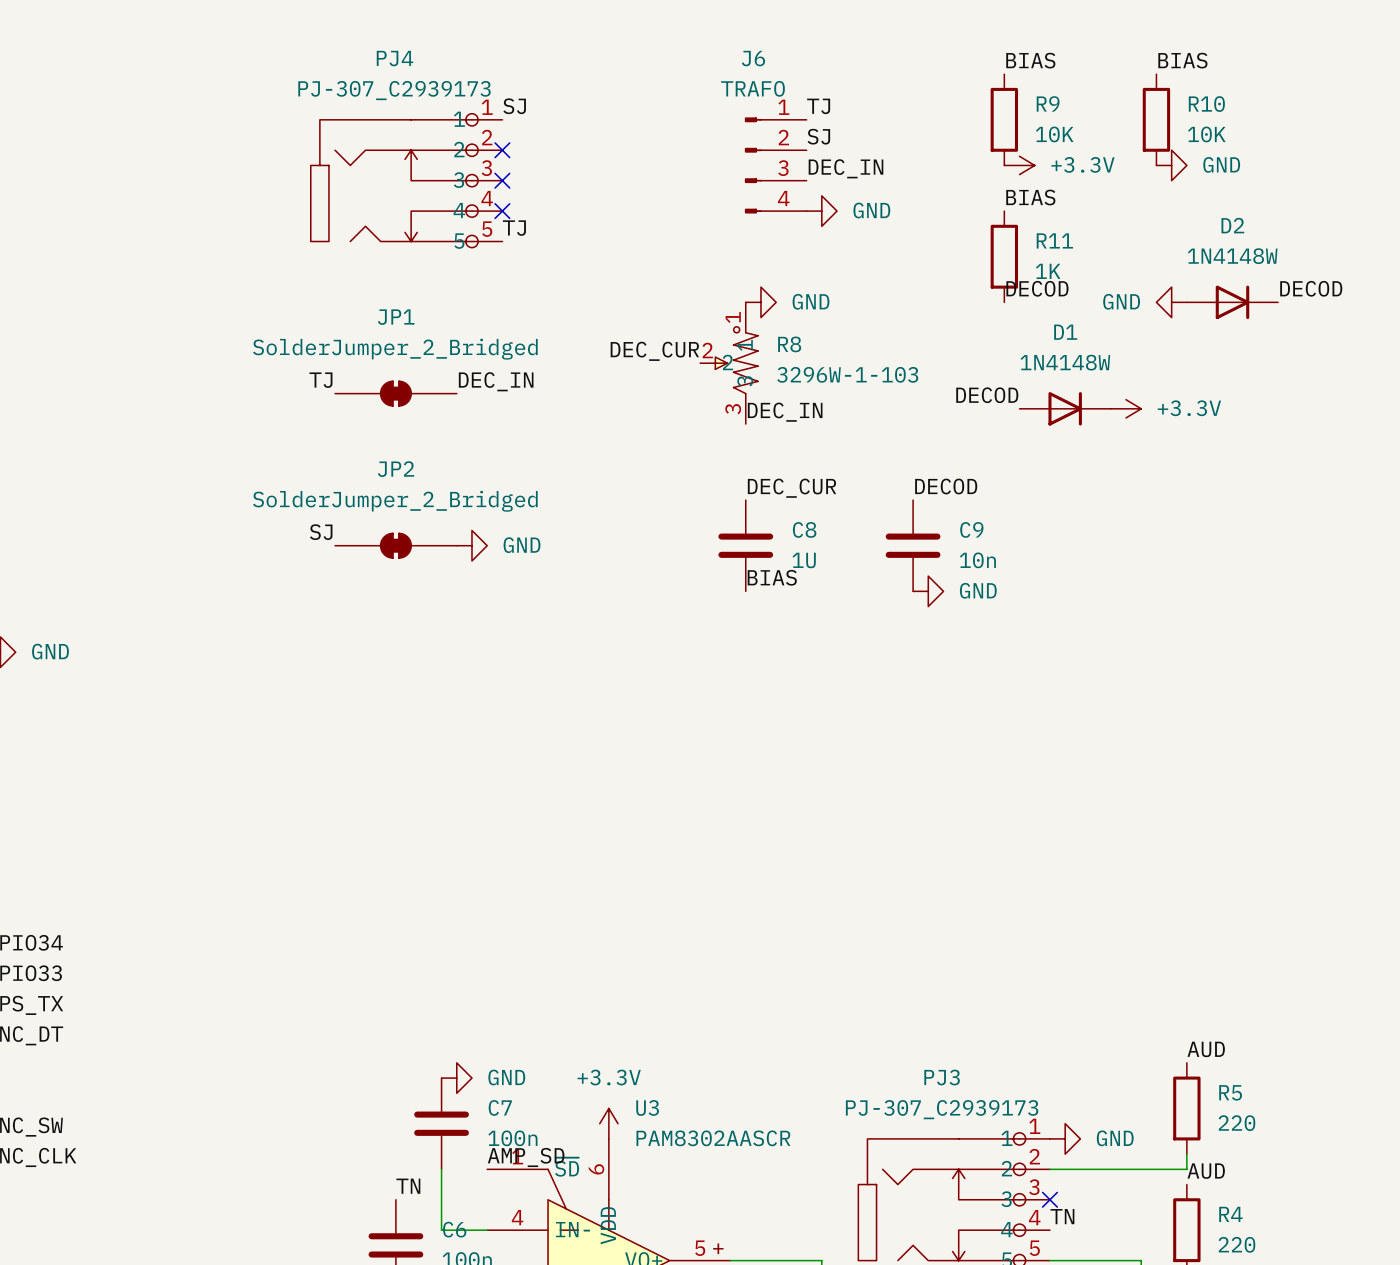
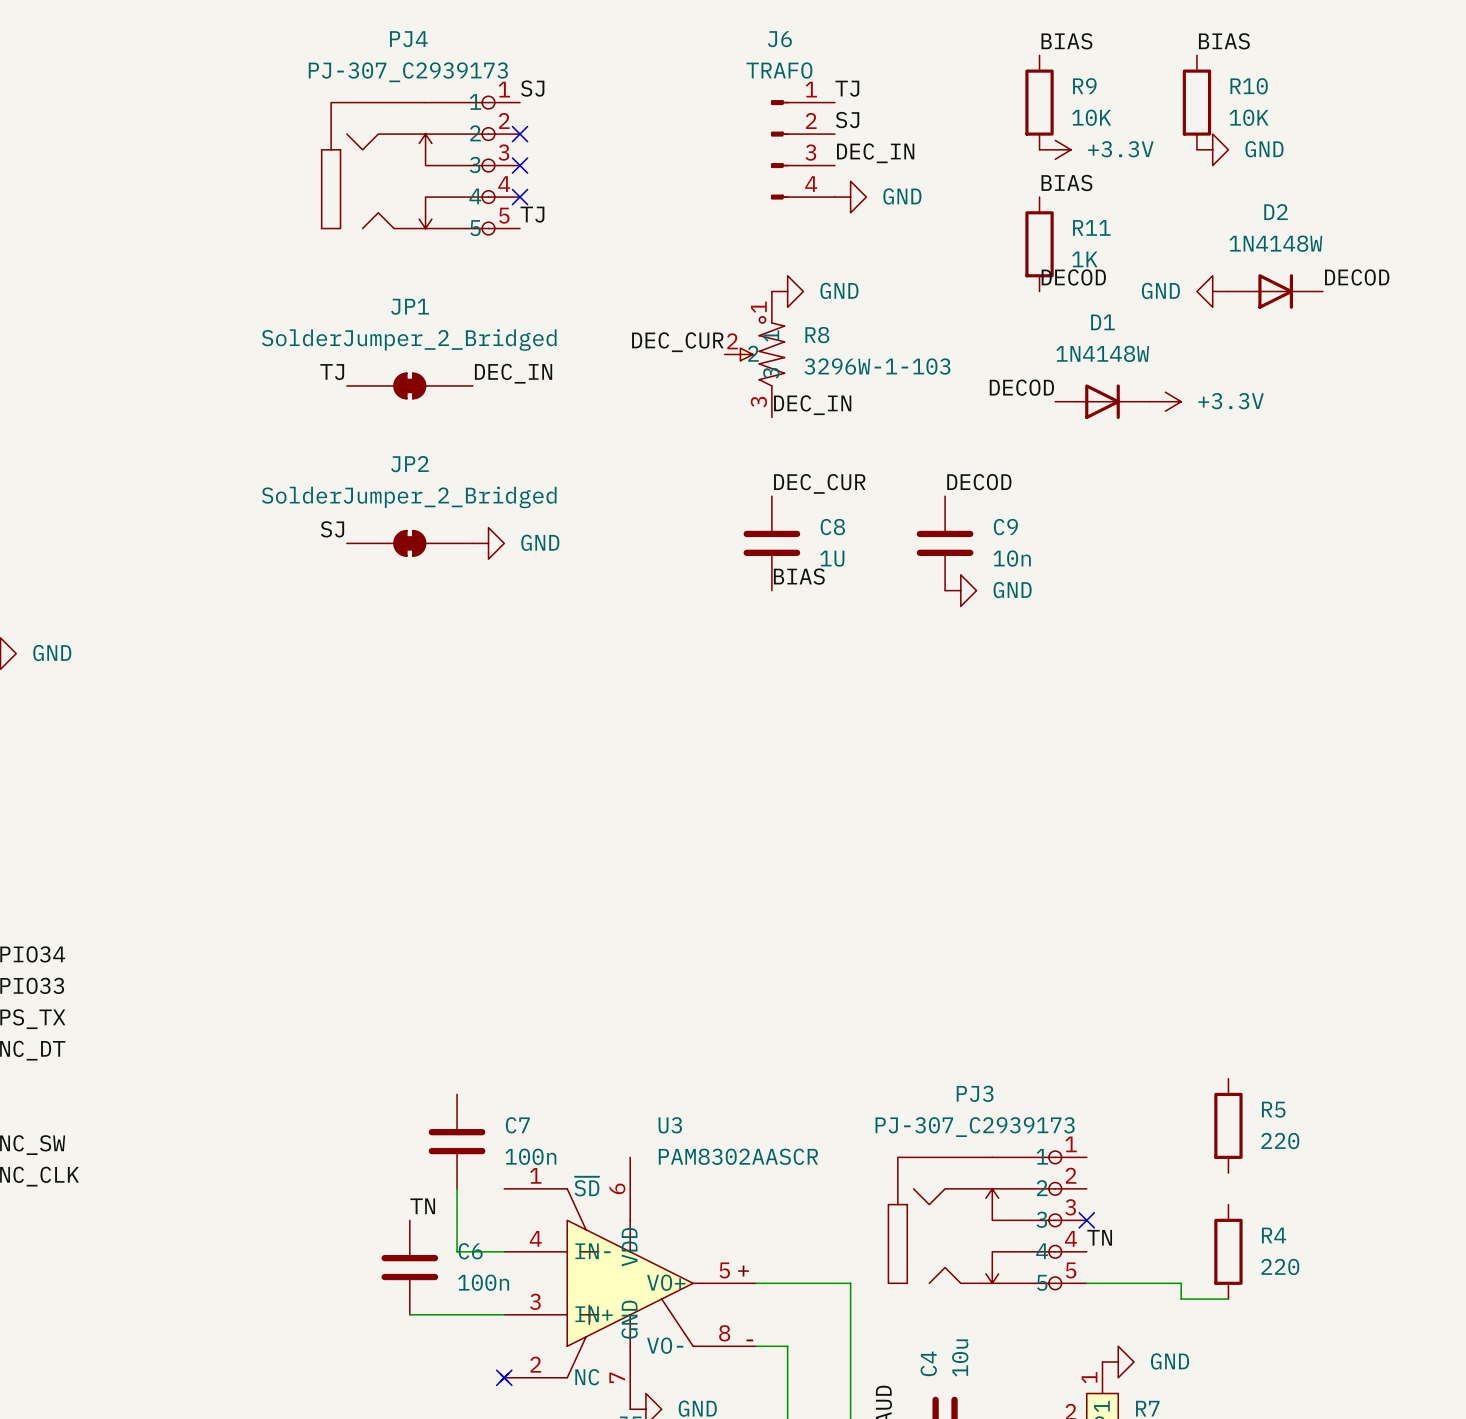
label: AUD (1206, 1049) -> none
power symbol: GND (456, 1078) -> none
power symbol: +3.3V (608, 1123) -> none
power symbol: GND (1065, 1138) -> none
wire: (1186, 1154) (1186, 1169) (1049, 1169) -> none
label: AMP_SD (526, 1157) -> none
label: AUD (1206, 1171) -> none

